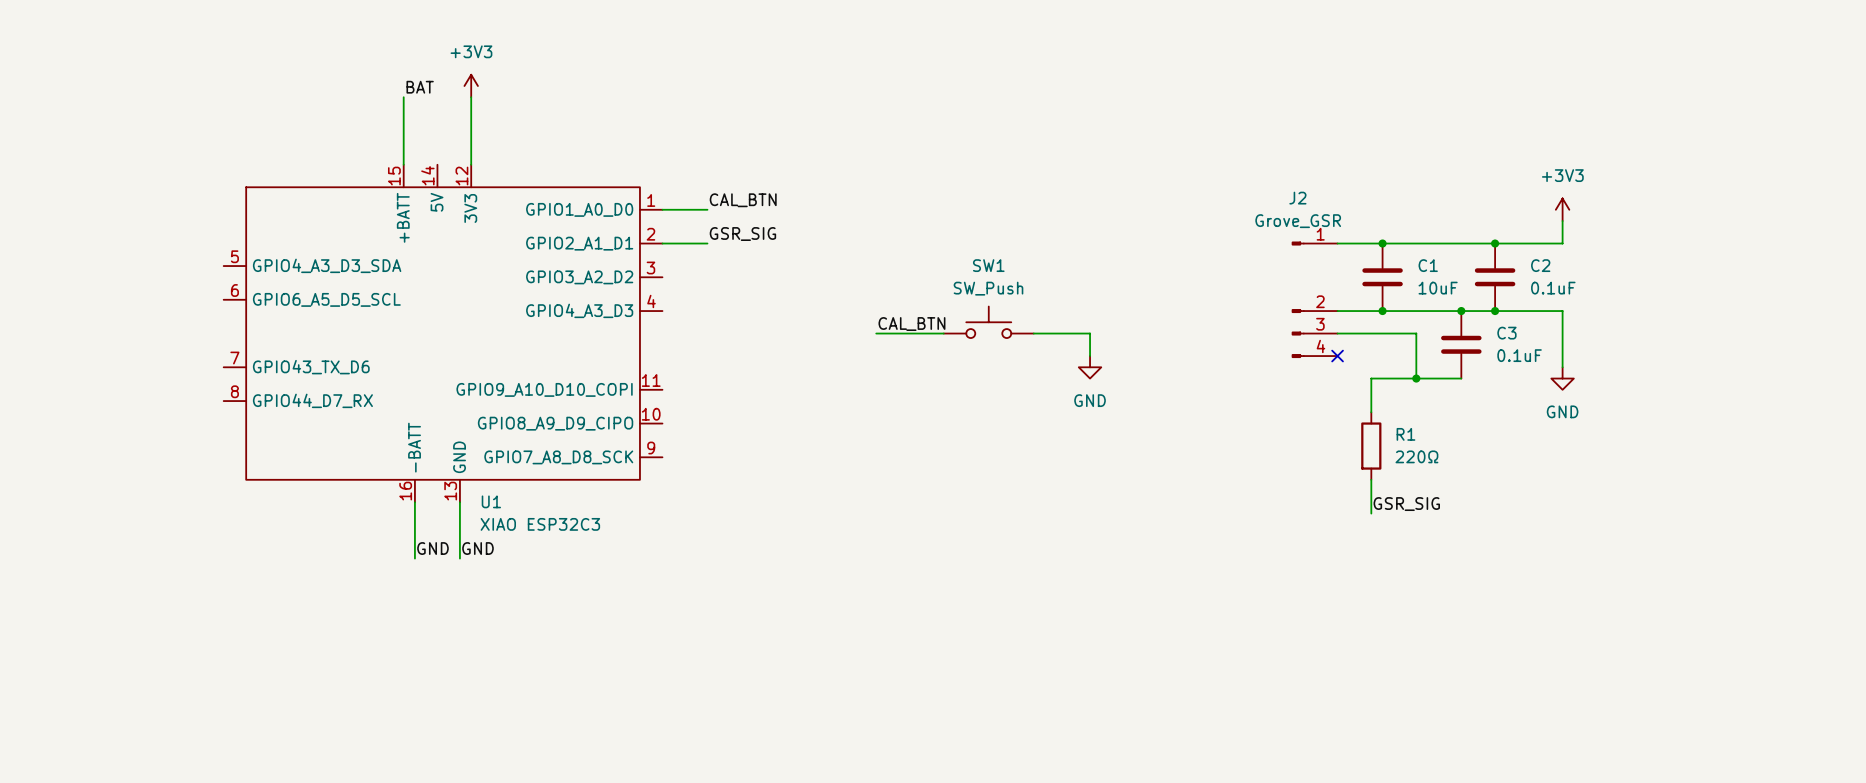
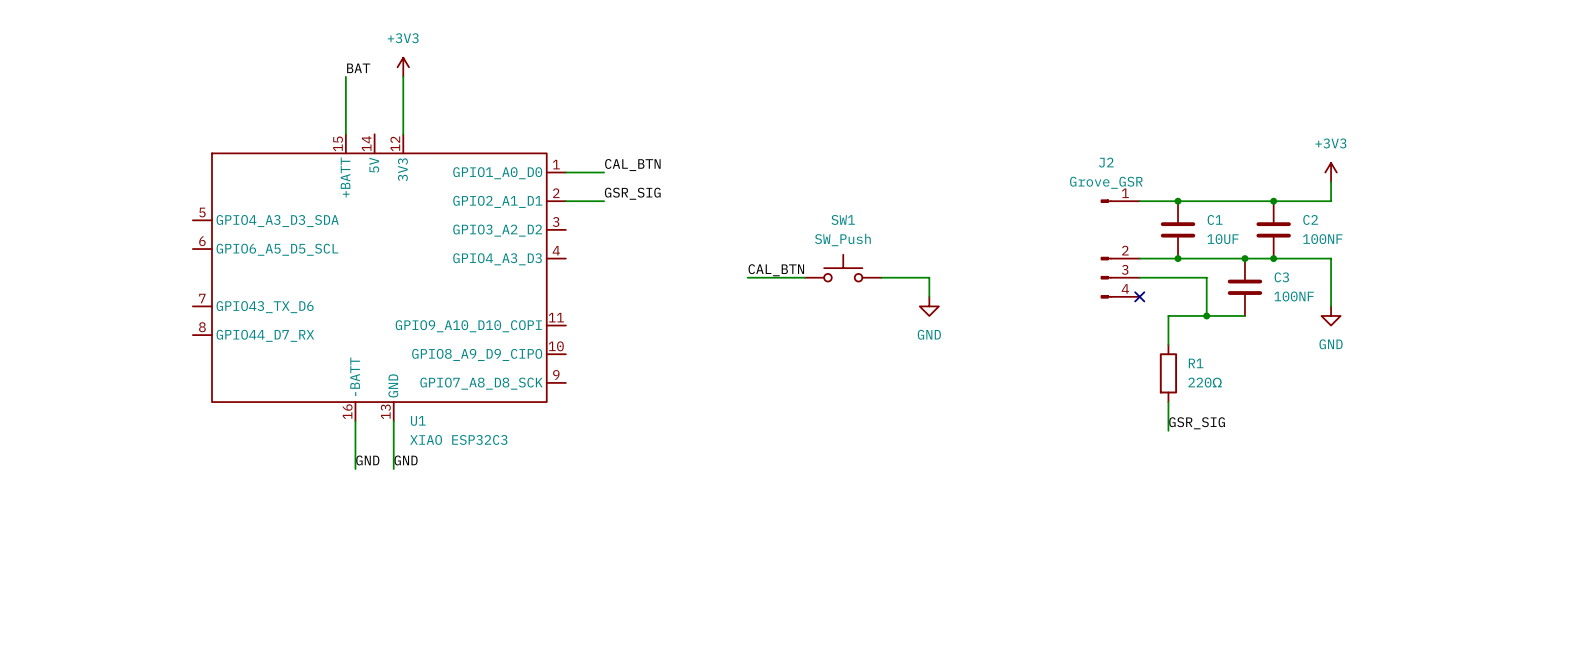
C1 value: 10uF (1438, 288) -> 10UF (1223, 239)
C2 value: 0.1uF (1553, 288) -> 100NF (1322, 239)
C3 value: 0.1uF (1519, 355) -> 100NF (1294, 296)

